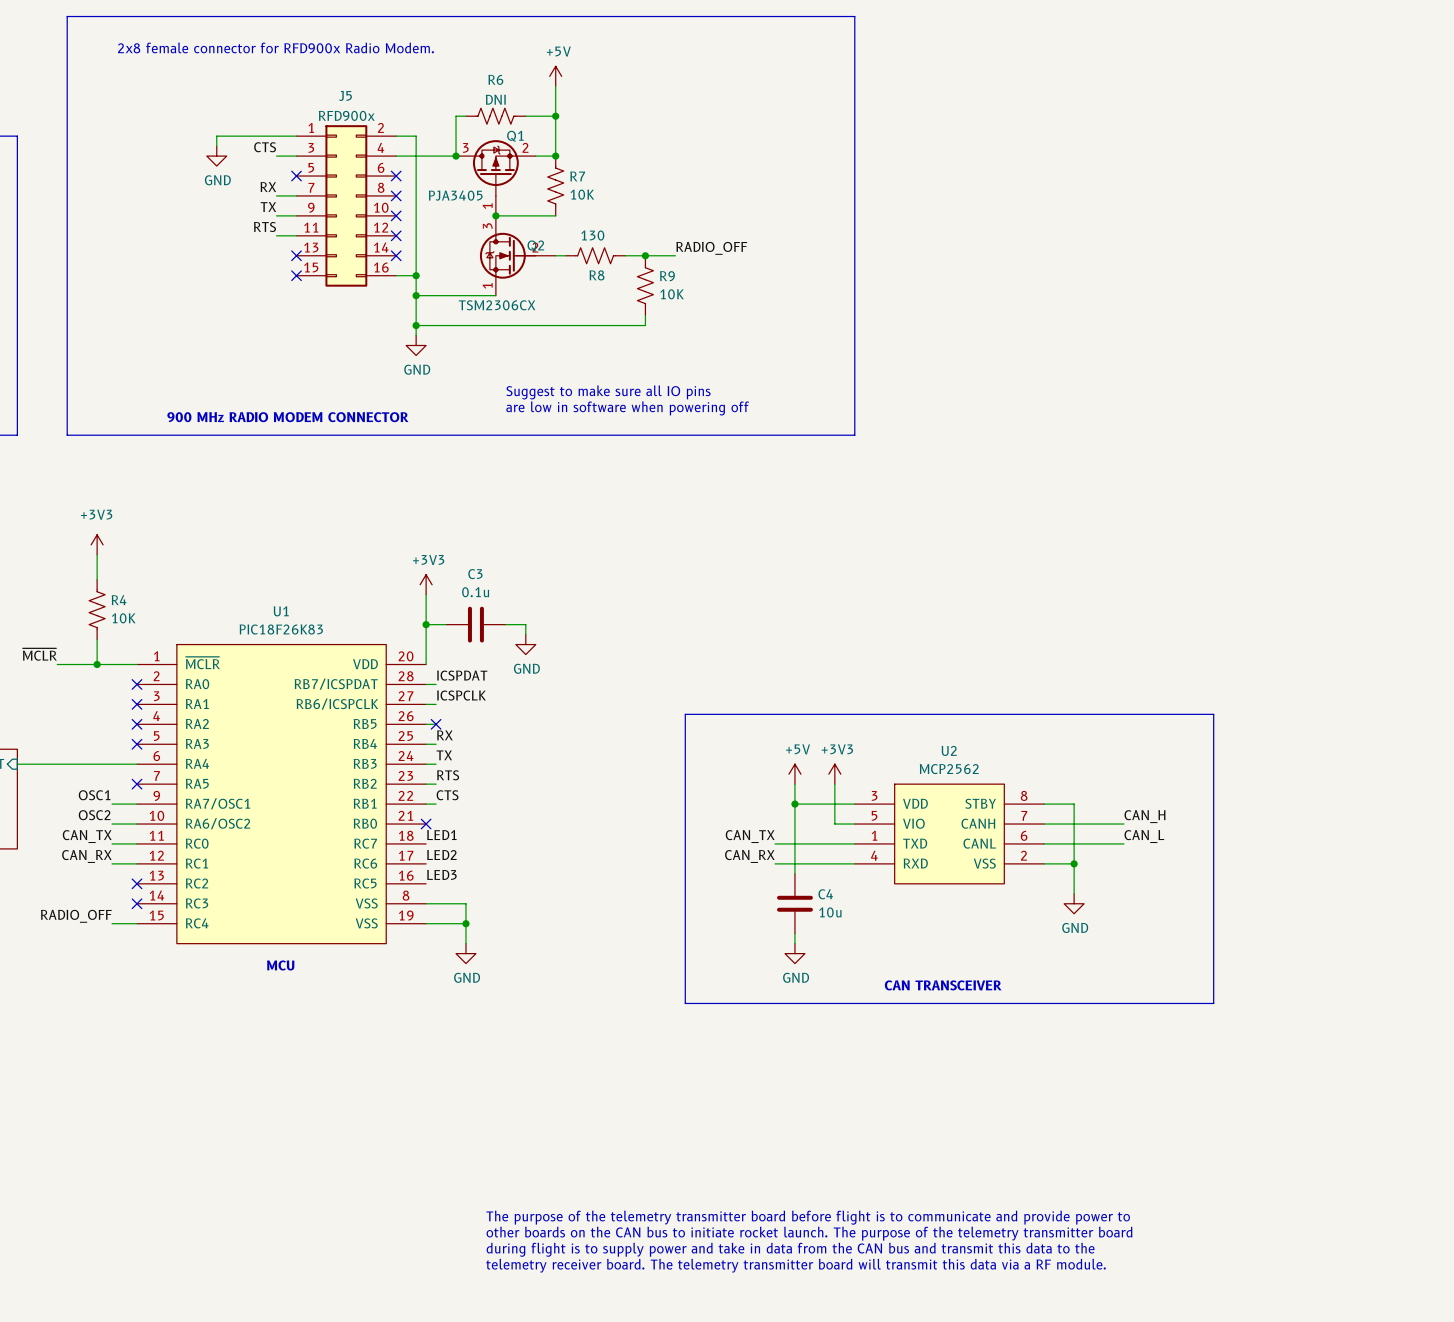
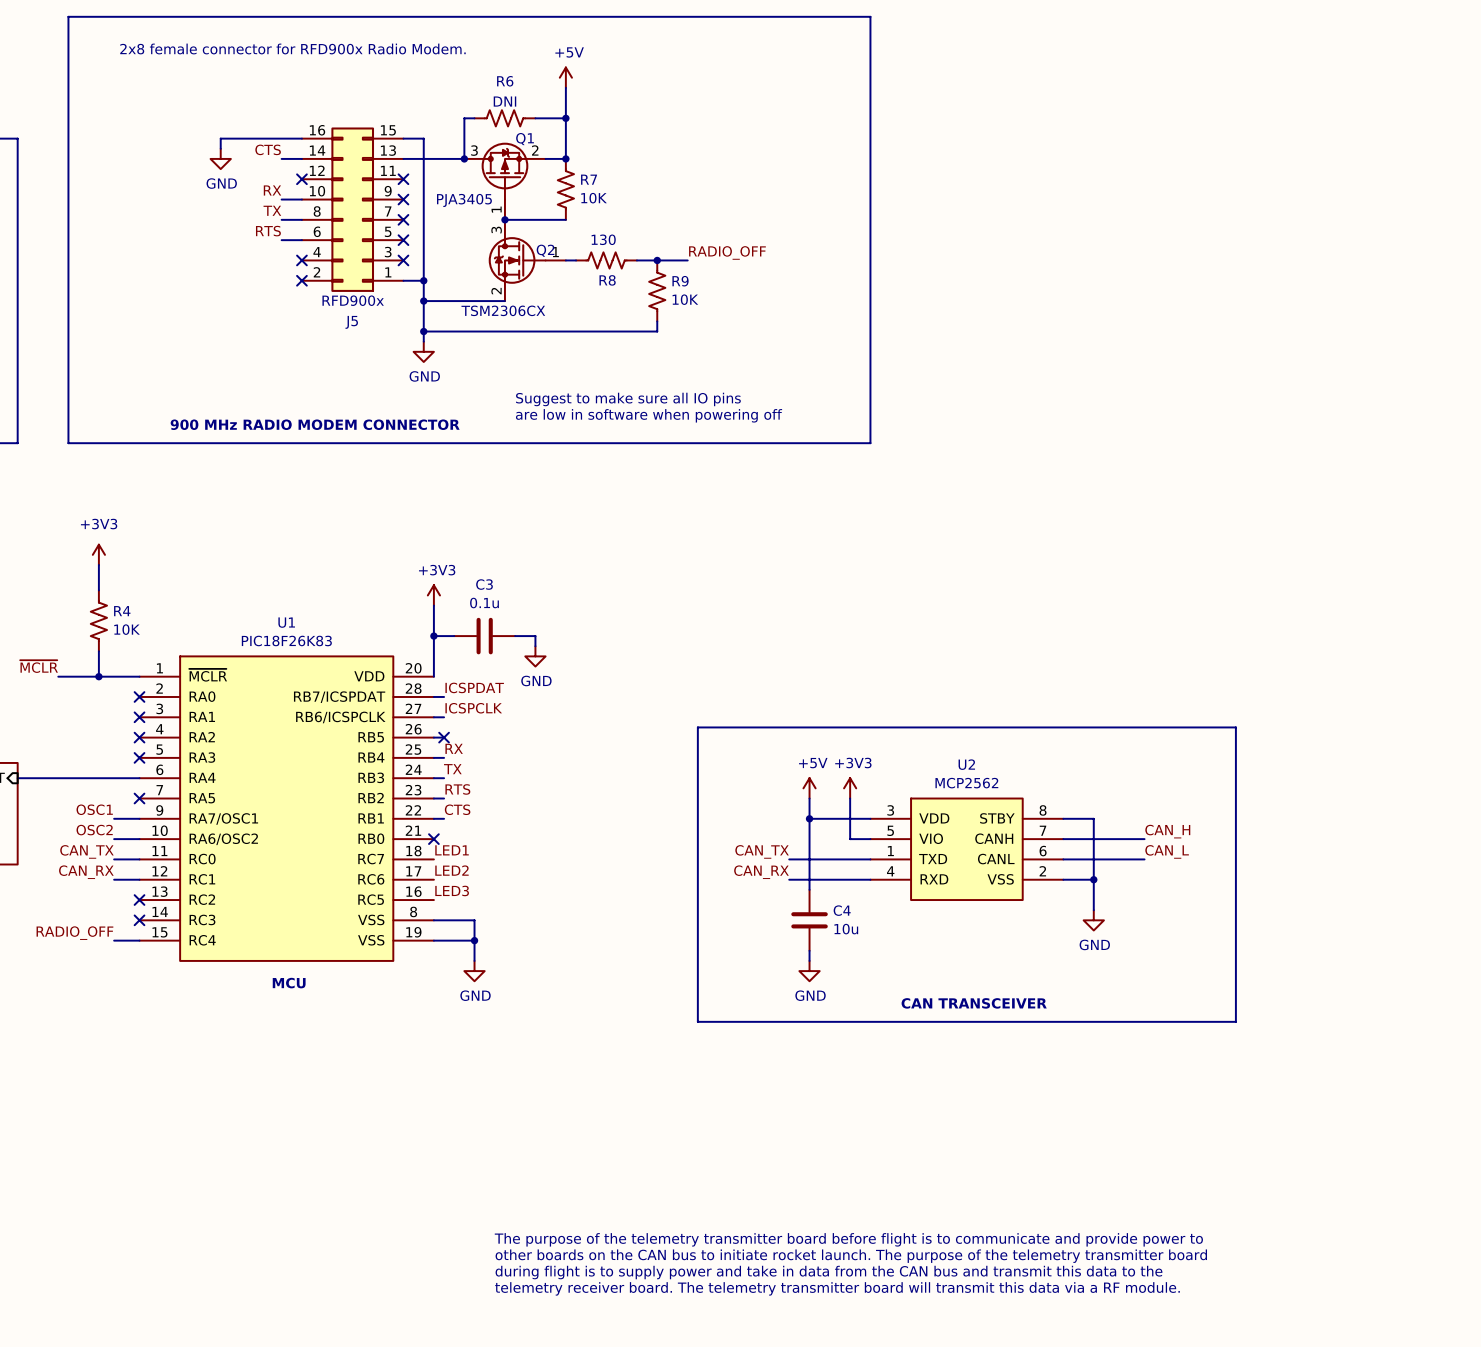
J5 rotation: 0° (346, 205) -> 180° (352, 209)
Q2 symbol: [479, 215, 556, 296] -> [488, 219, 566, 302]

